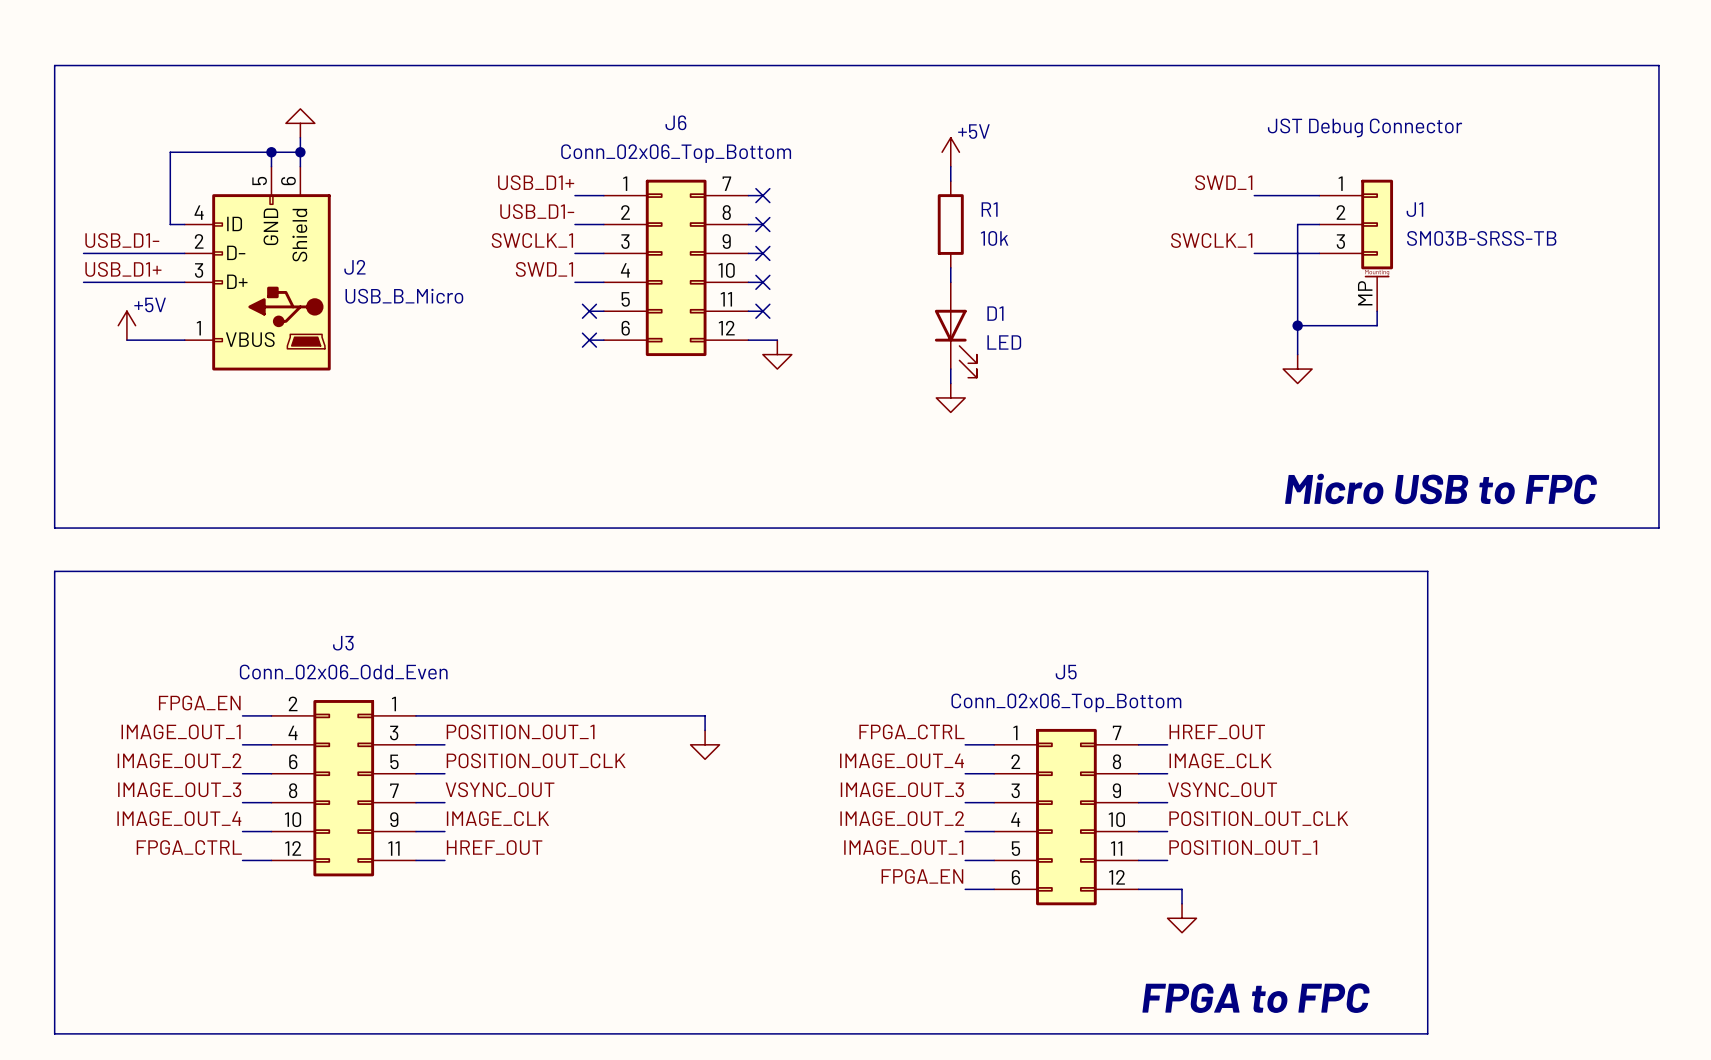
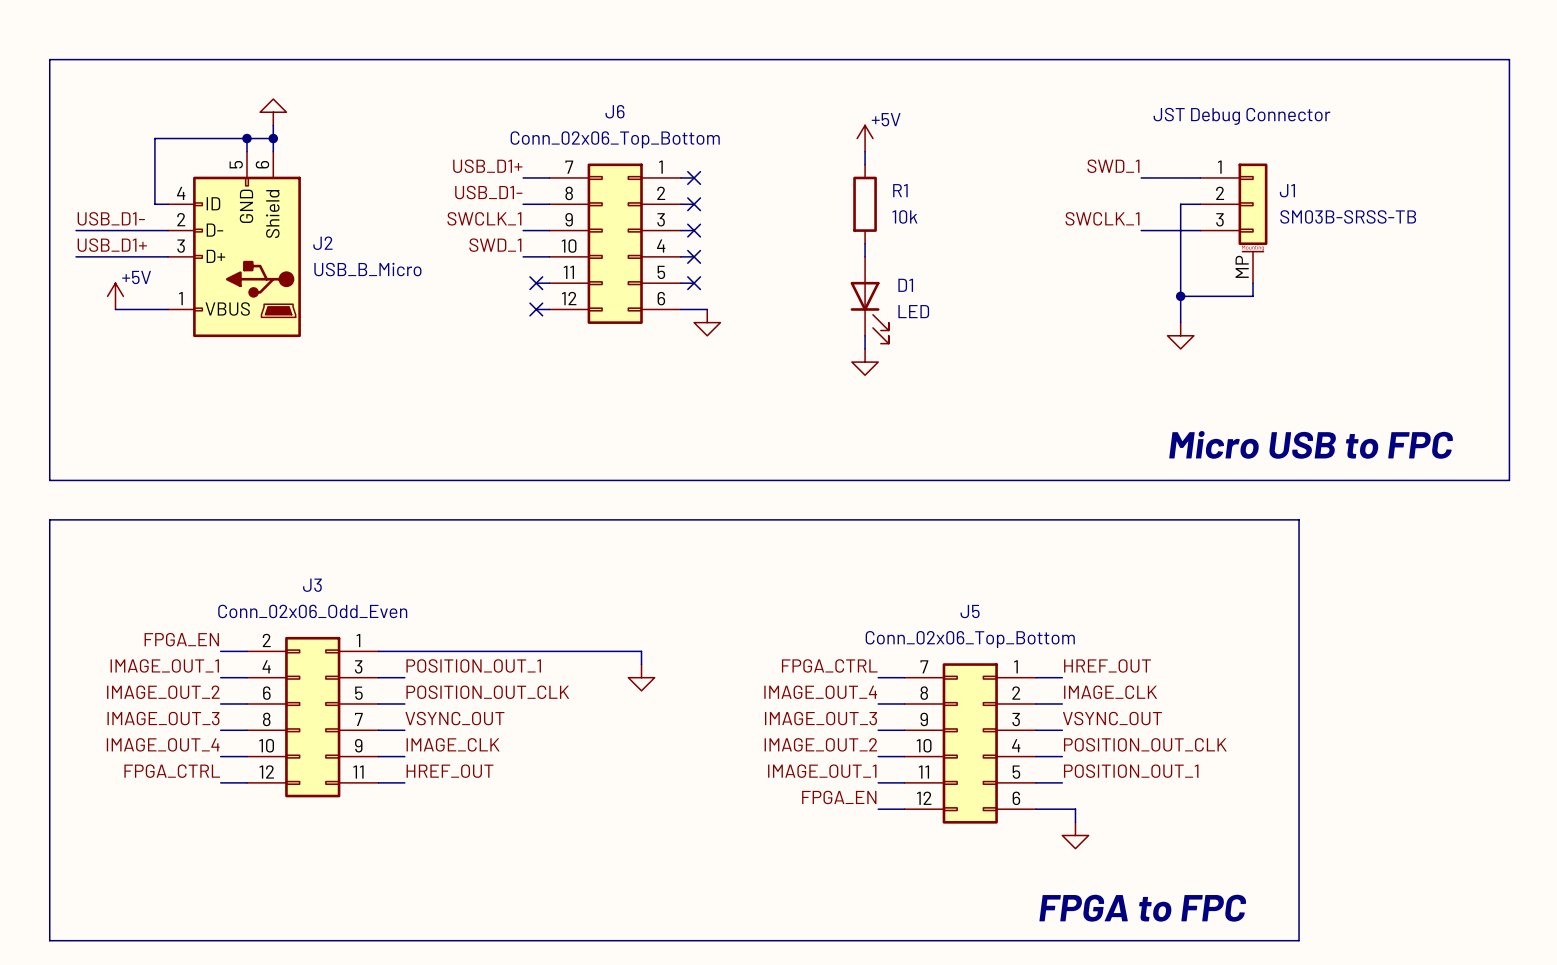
J6 flip: as is (676, 267) -> left-right (615, 243)
J5 flip: as is (1066, 817) -> left-right (970, 743)

